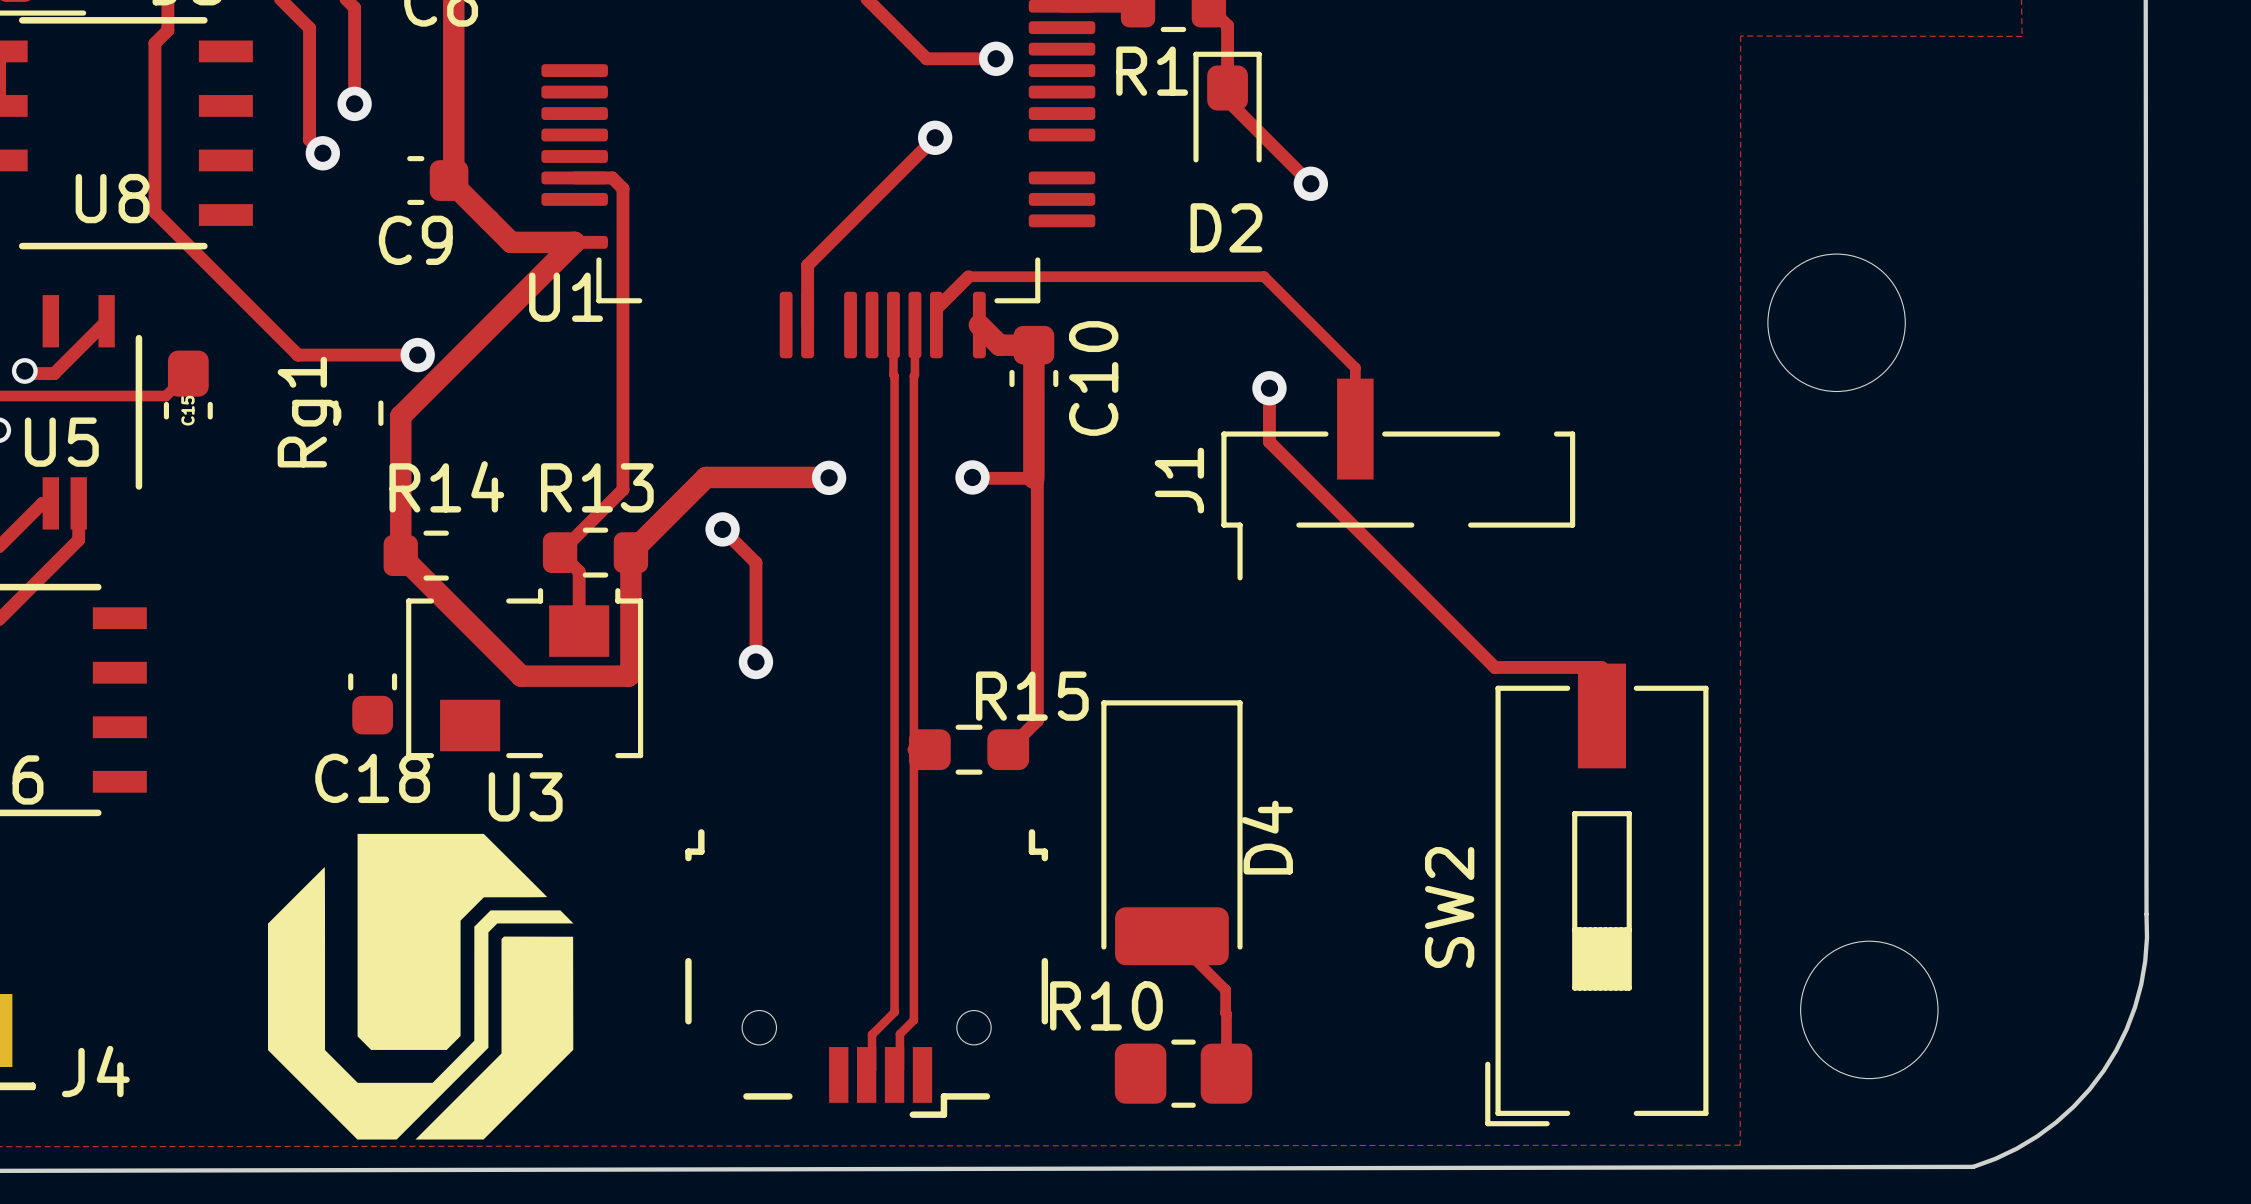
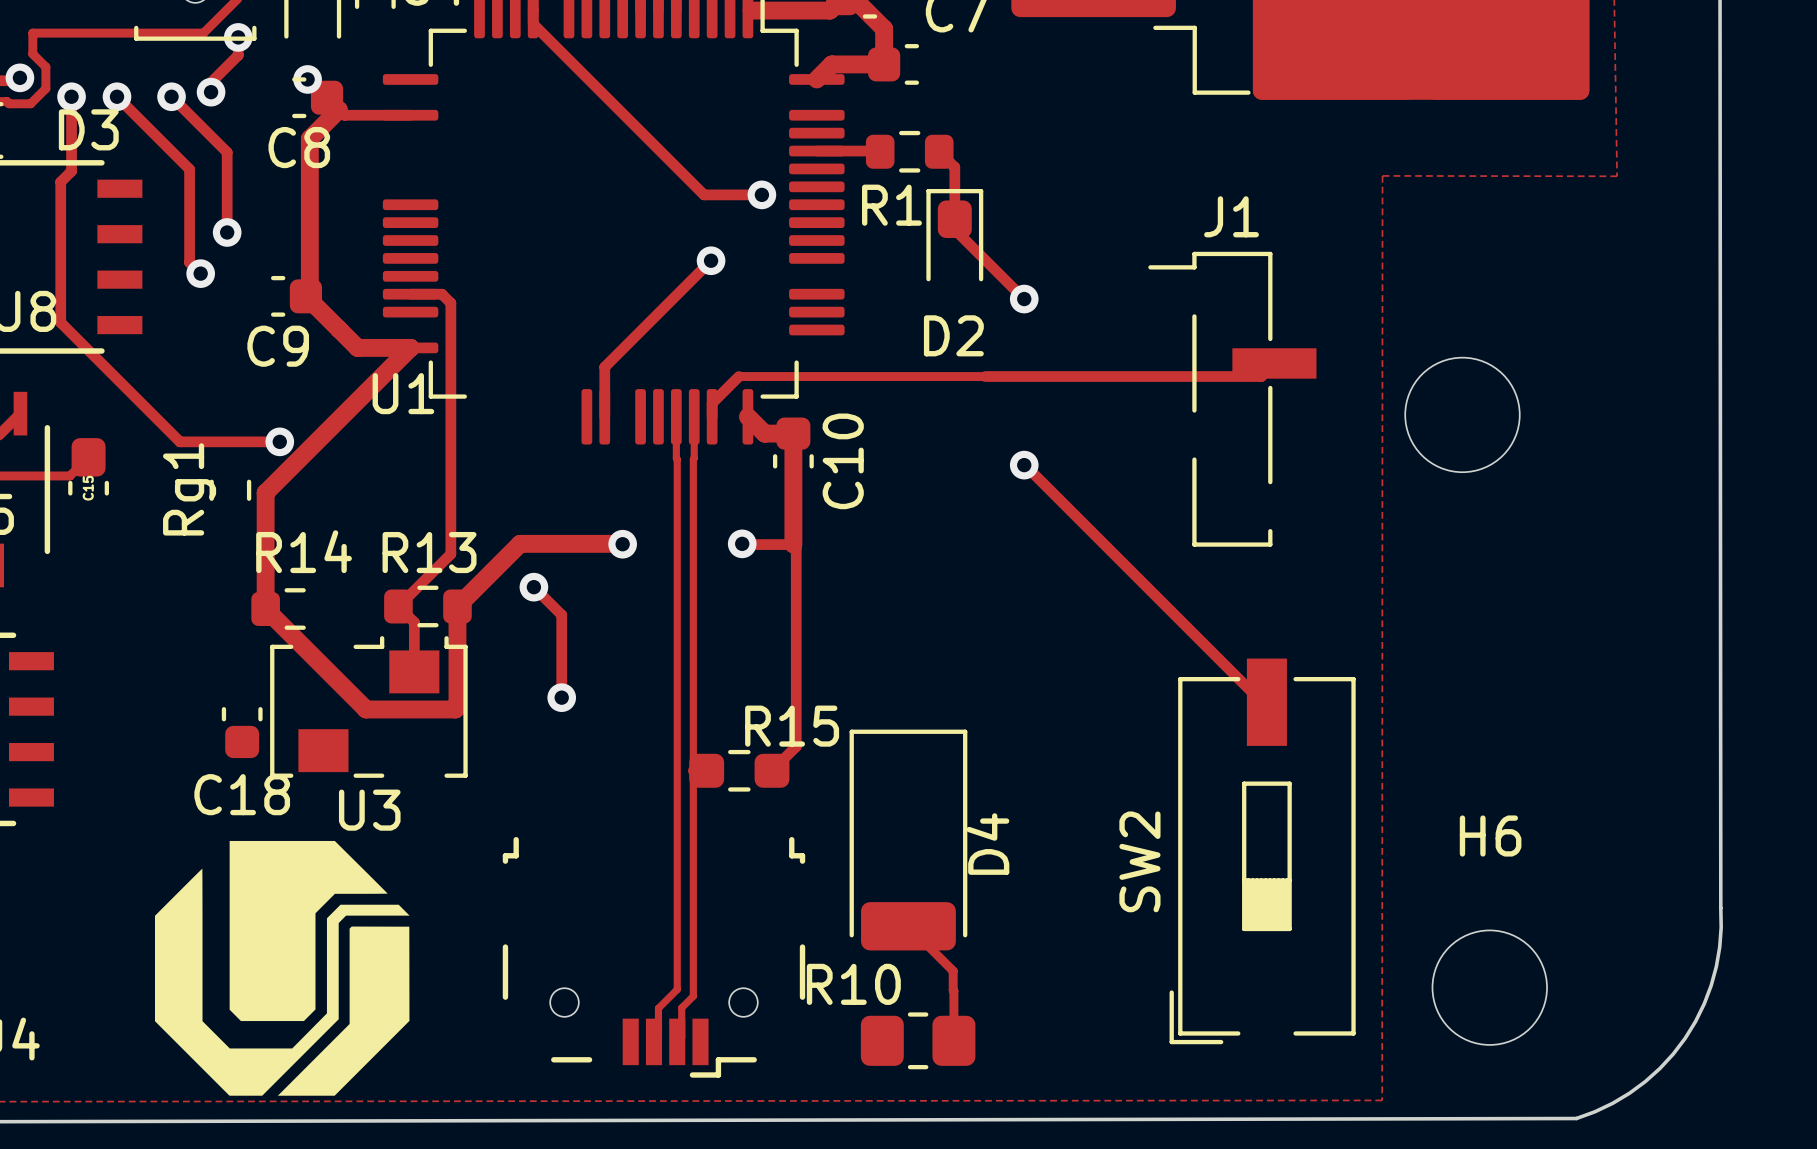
track: (1264, 276) (1355, 367) (1355, 429) -> (985, 376) (1261, 376) (1274, 363)
track: (1269, 388) (1269, 441) (1494, 667) (1596, 667) -> (1023, 464) (1262, 702)
via position: (1269, 388) -> (1024, 465)
J1 rotation: 0° (1398, 479) -> 90° clockwise (1232, 399)
J1 position: (1398, 479) -> (1232, 399)
H6 name: none -> H6 (1490, 836)
SW2 position: (1596, 894) -> (1262, 851)

